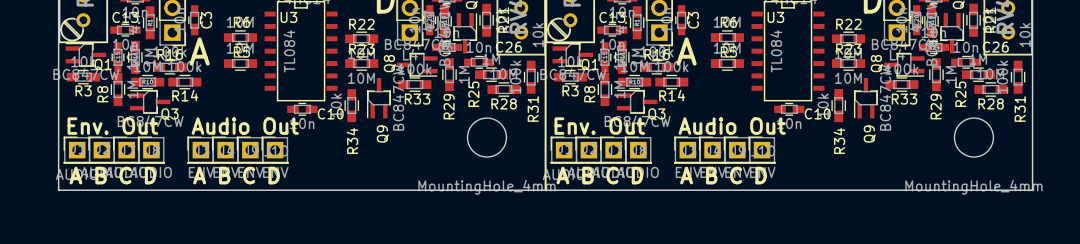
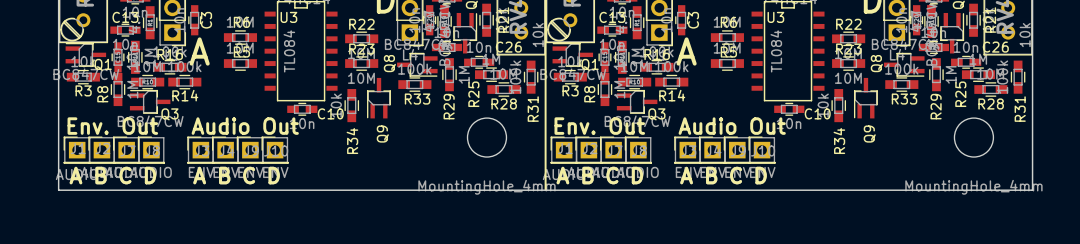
Q9 value: BC847CW (398, 97) -> none
Q9 value: BC847CW (885, 97) -> none

